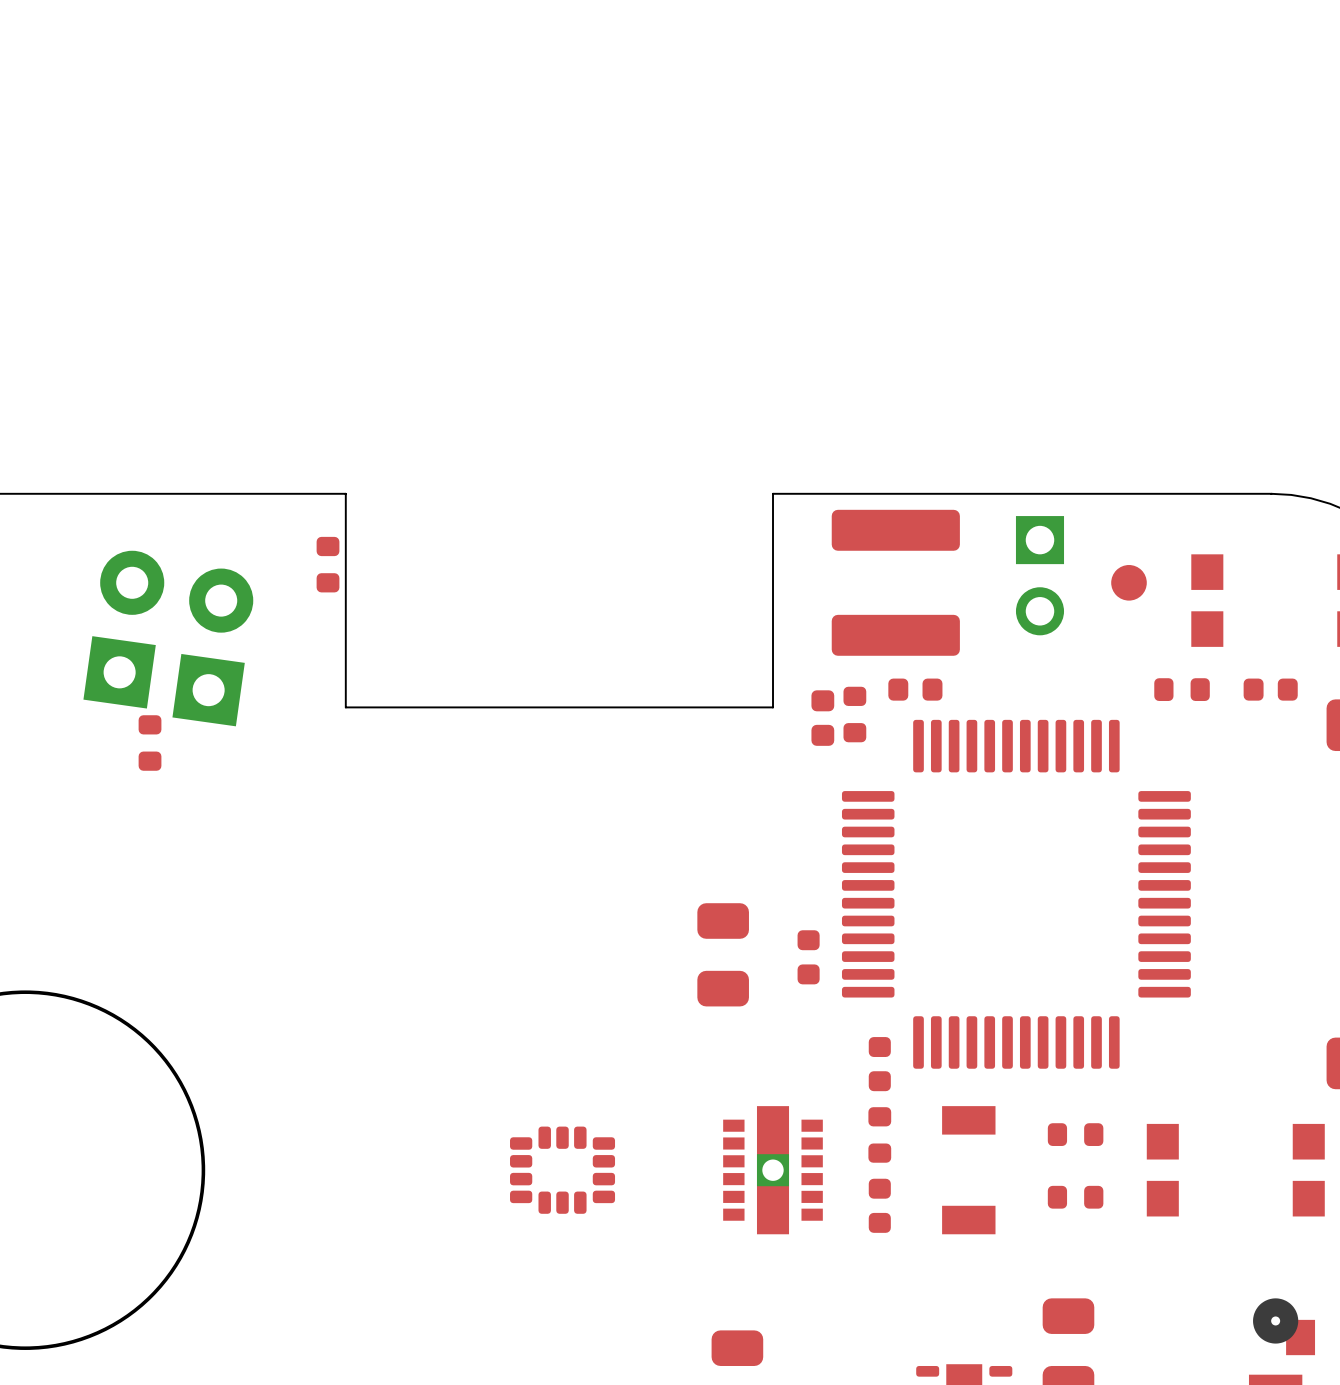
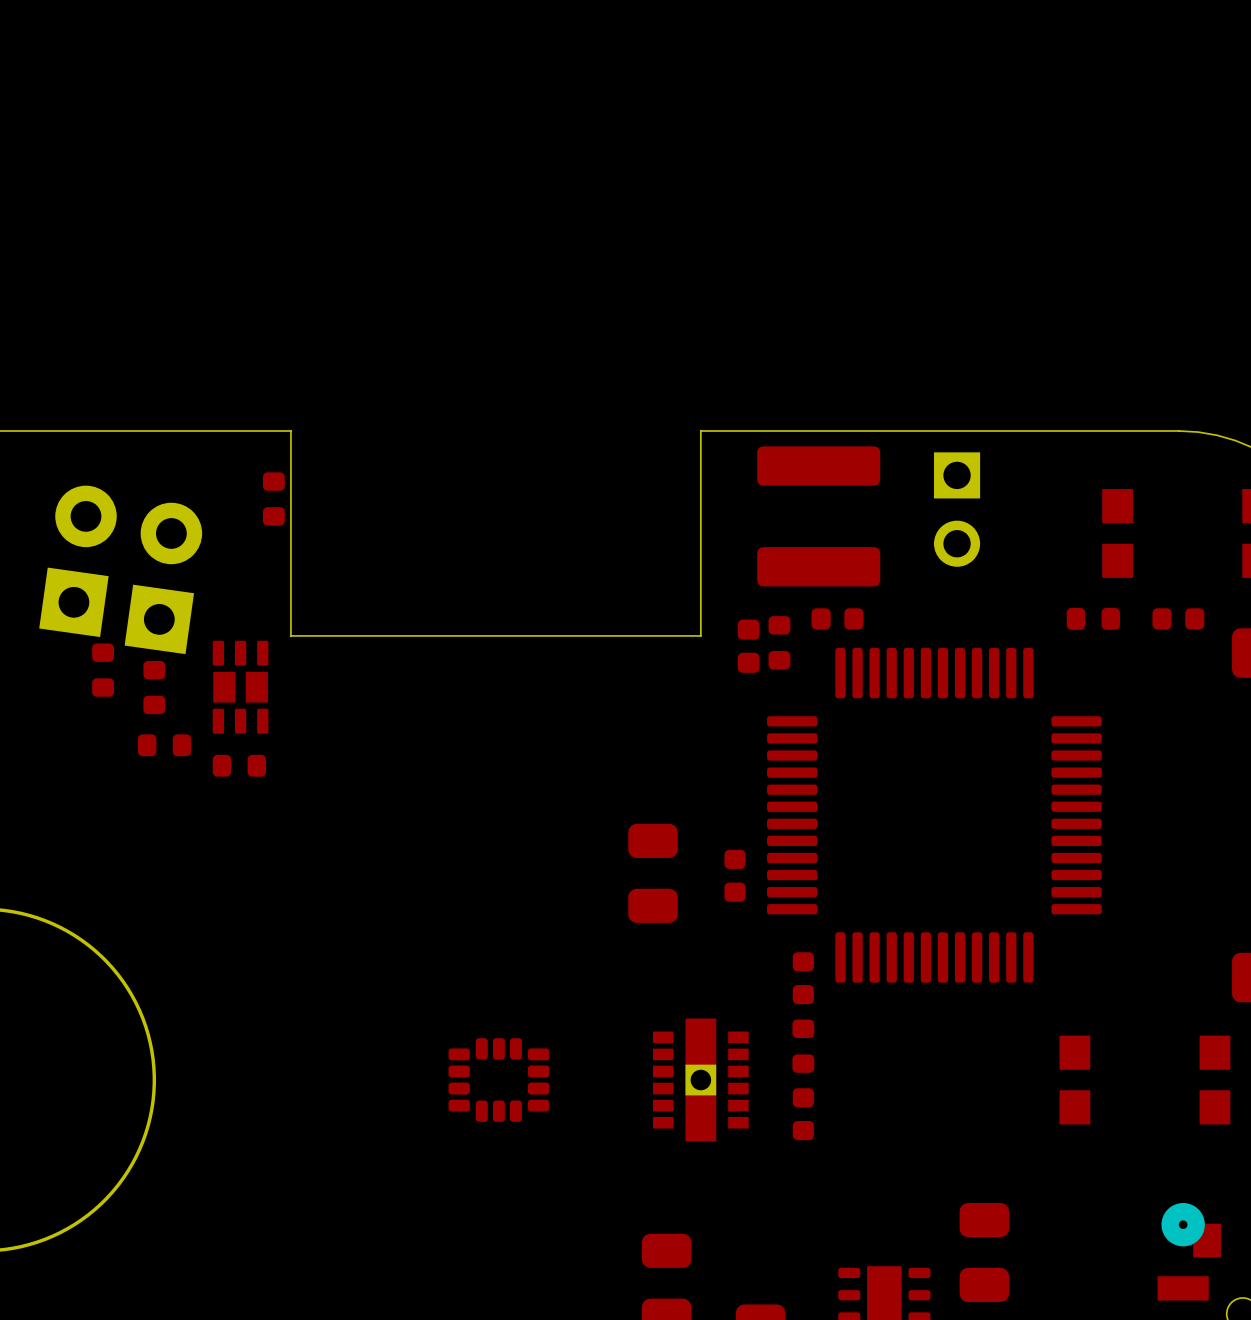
part: (1128, 582) -> none
part: none -> (240, 687)
part: none -> (154, 687)
part: none -> (164, 745)
part: none -> (239, 765)
part: (1075, 1134) -> none
part: (968, 1170) -> none
part: (1075, 1197) -> none

